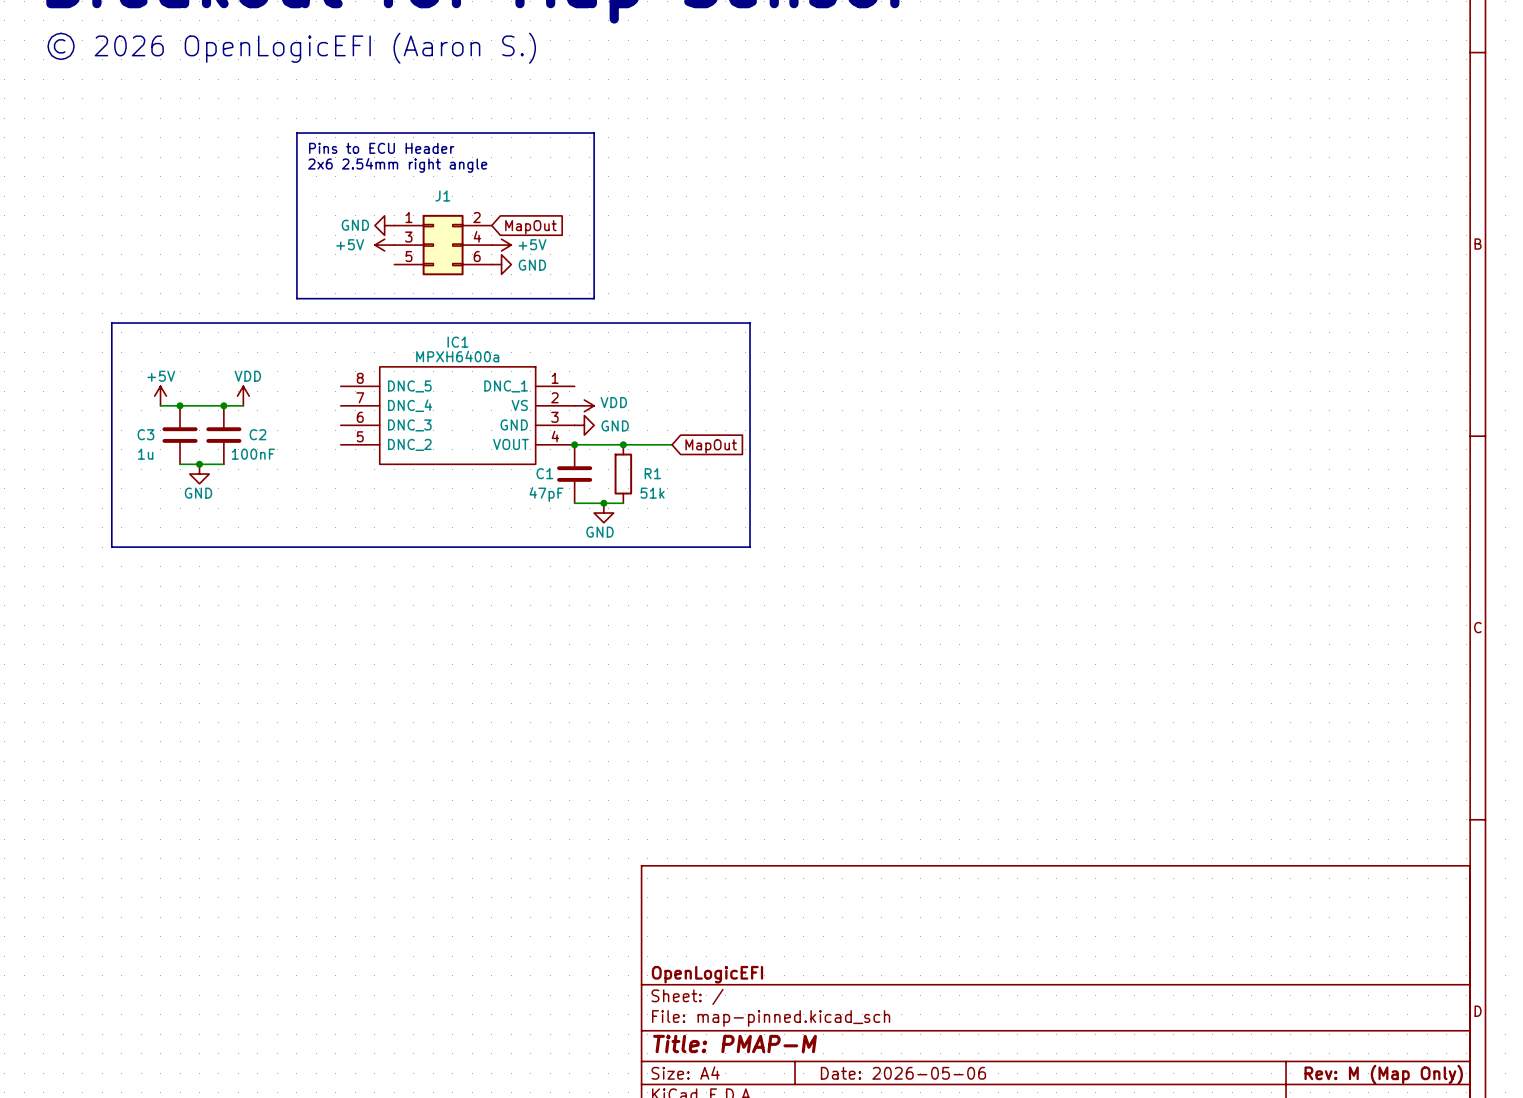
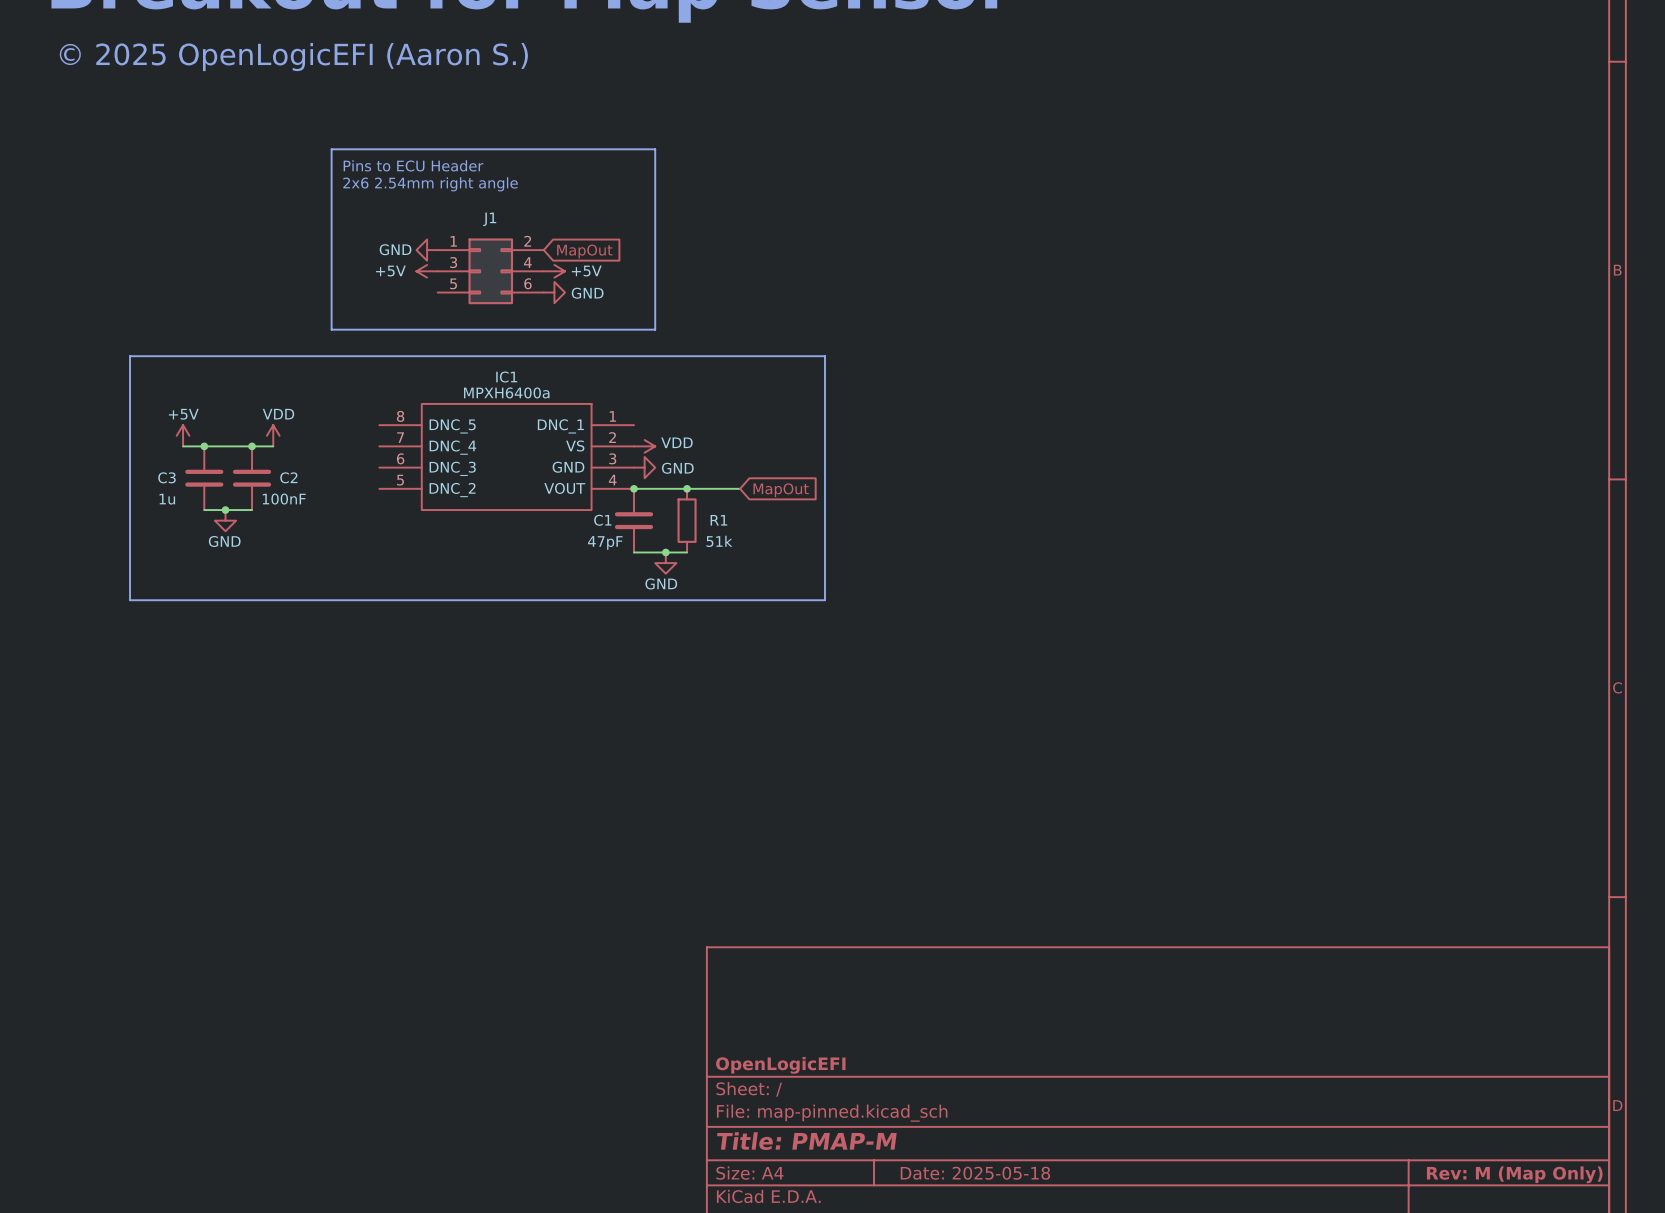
text: © 2026 OpenLogicEFI (Aaron S.) (291, 48) -> © 2025 OpenLogicEFI (Aaron S.) (293, 57)
title block: Date: 2026-05-06 (903, 1073) -> Date: 2025-05-18 (975, 1173)

